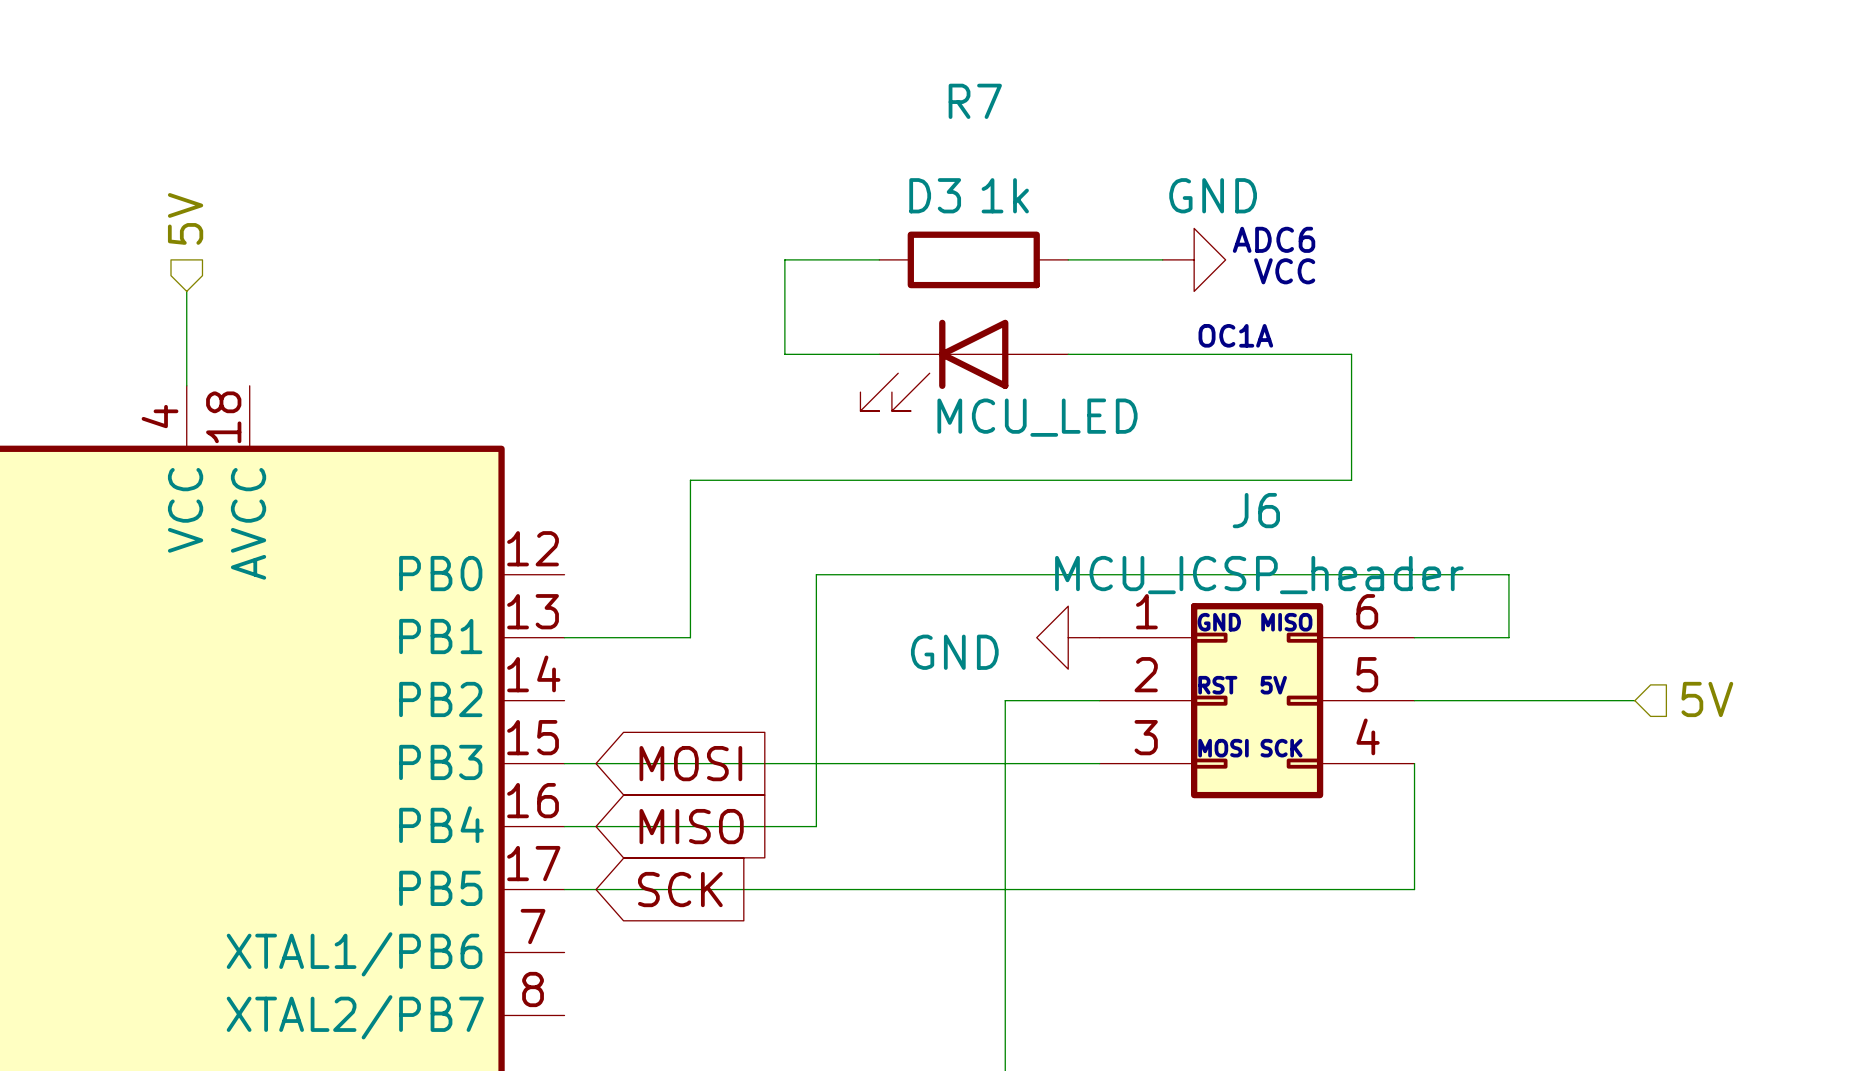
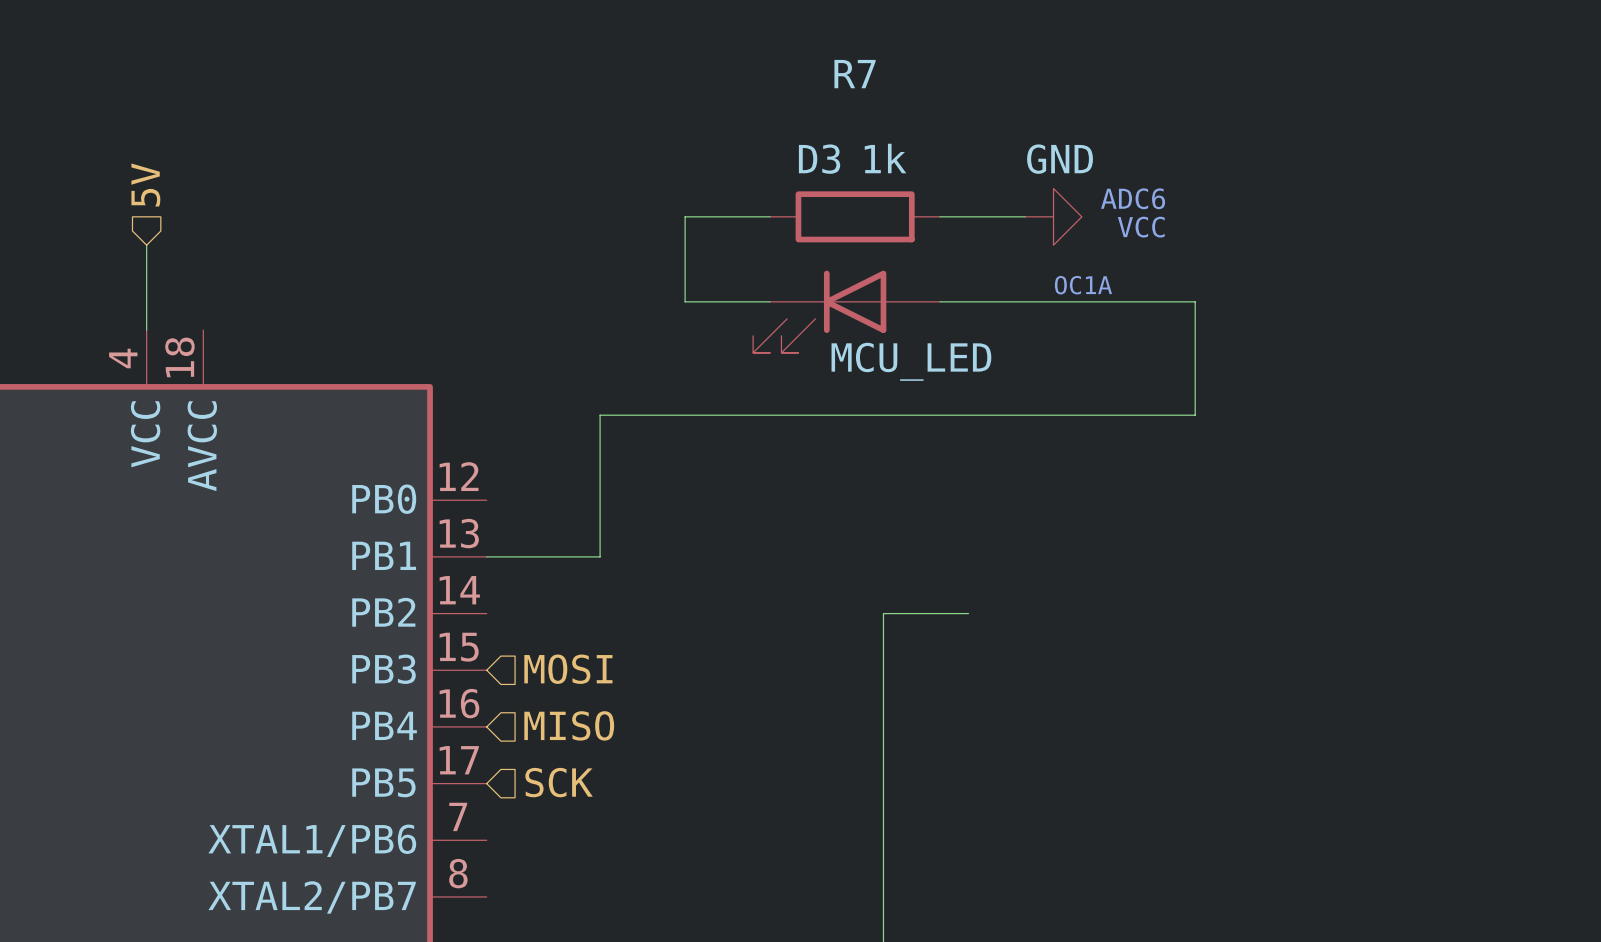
text: GND (1219, 622) -> none
text: MISO (1286, 622) -> none
power symbol: GND (1068, 637) -> none
wire: (1414, 637) (1508, 637) (1508, 574) (816, 574) (816, 826) (564, 826) -> none
text: RST (1217, 685) -> none
text: 5V (1273, 685) -> none
hierarchical label: 5V (1707, 699) -> none
J6: MCU_ICSP_header (1257, 700) -> none
wire: (1414, 700) (1634, 700) -> none
text: MOSI (1223, 748) -> none
text: SCK (1281, 748) -> none
hierarchical label: none -> MOSI (568, 669)
wire: (564, 763) (1099, 763) -> none
global label: MOSI (690, 763) -> none
wire: (1414, 763) (1414, 889) (564, 889) -> none
hierarchical label: none -> MISO (569, 725)
global label: MISO (691, 826) -> none
hierarchical label: none -> SCK (559, 782)
global label: SCK (680, 889) -> none

